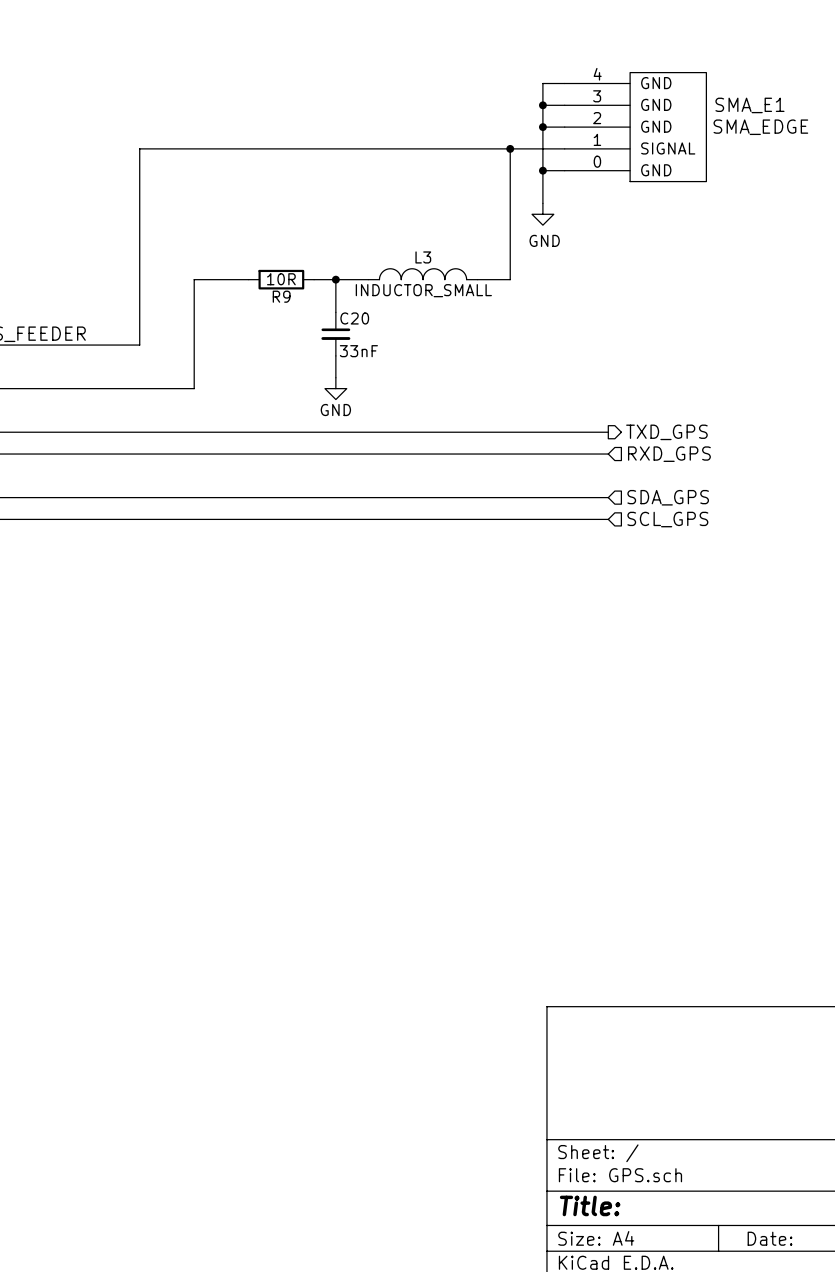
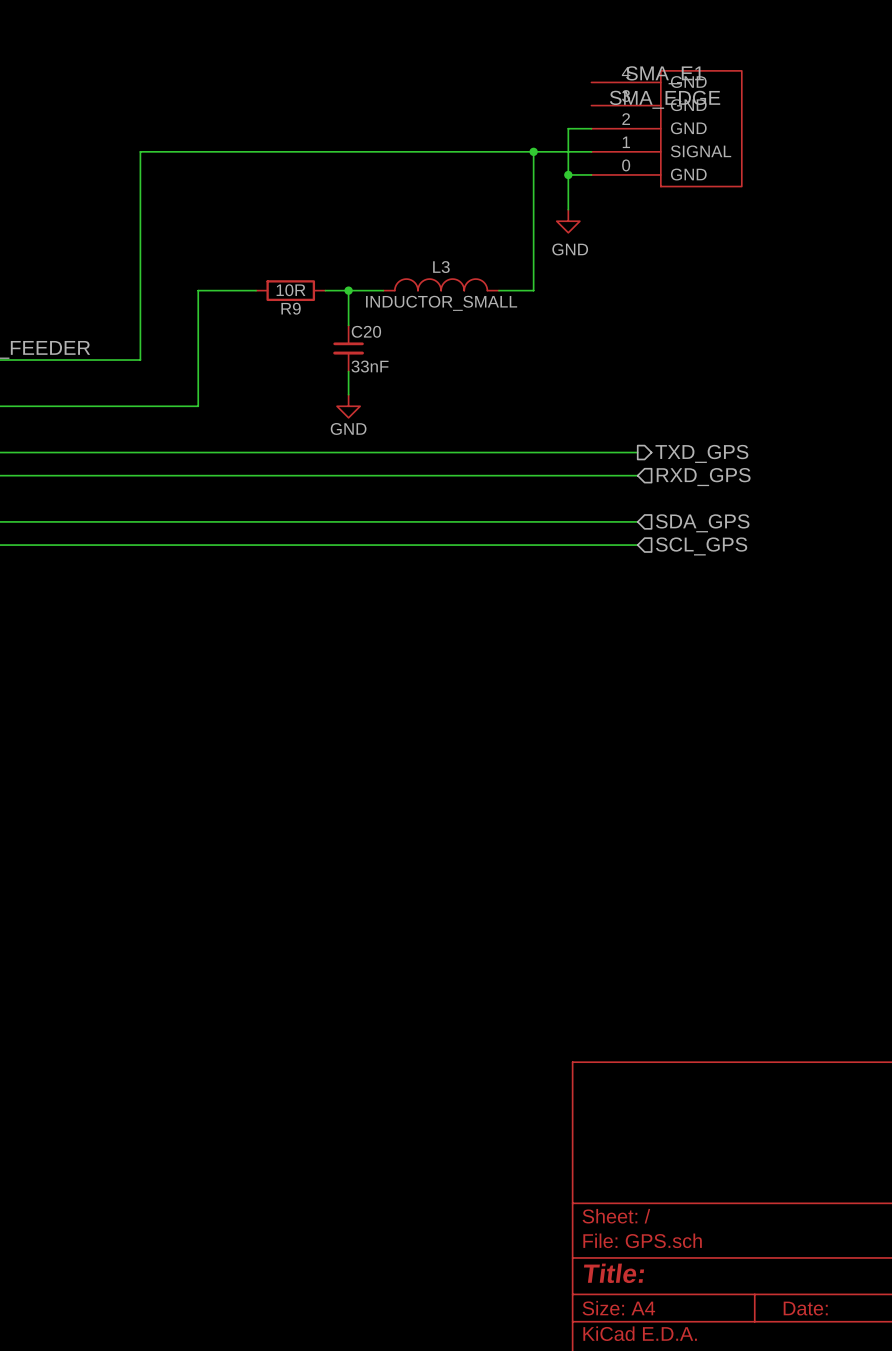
wire: (564, 83) (542, 83) (542, 127) -> none
wire: (542, 105) (564, 105) -> none
junction: (542, 105) -> none
SMA_E1 name position: SMA_E1 (749, 105) -> SMA_E1 (664, 75)
junction: (542, 127) -> none
SMA_E1 value position: SMA_EDGE (760, 127) -> SMA_EDGE (665, 99)

